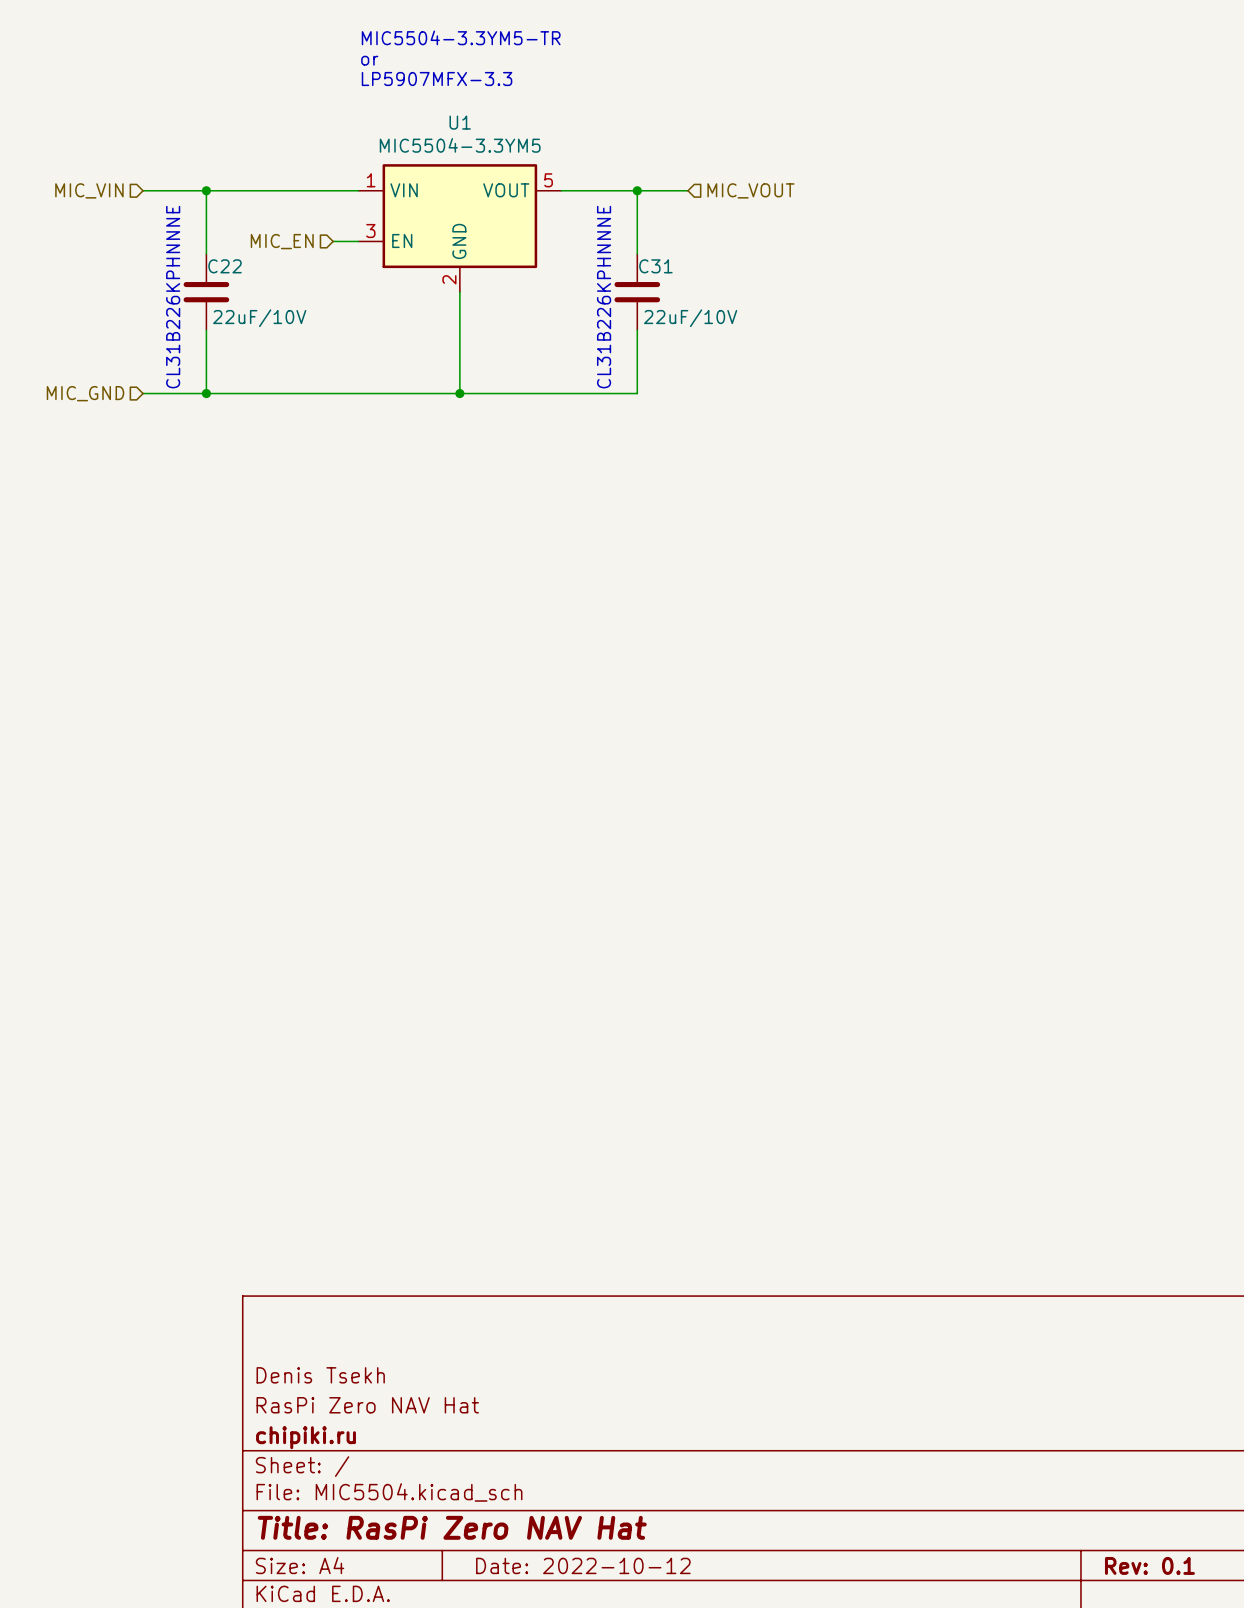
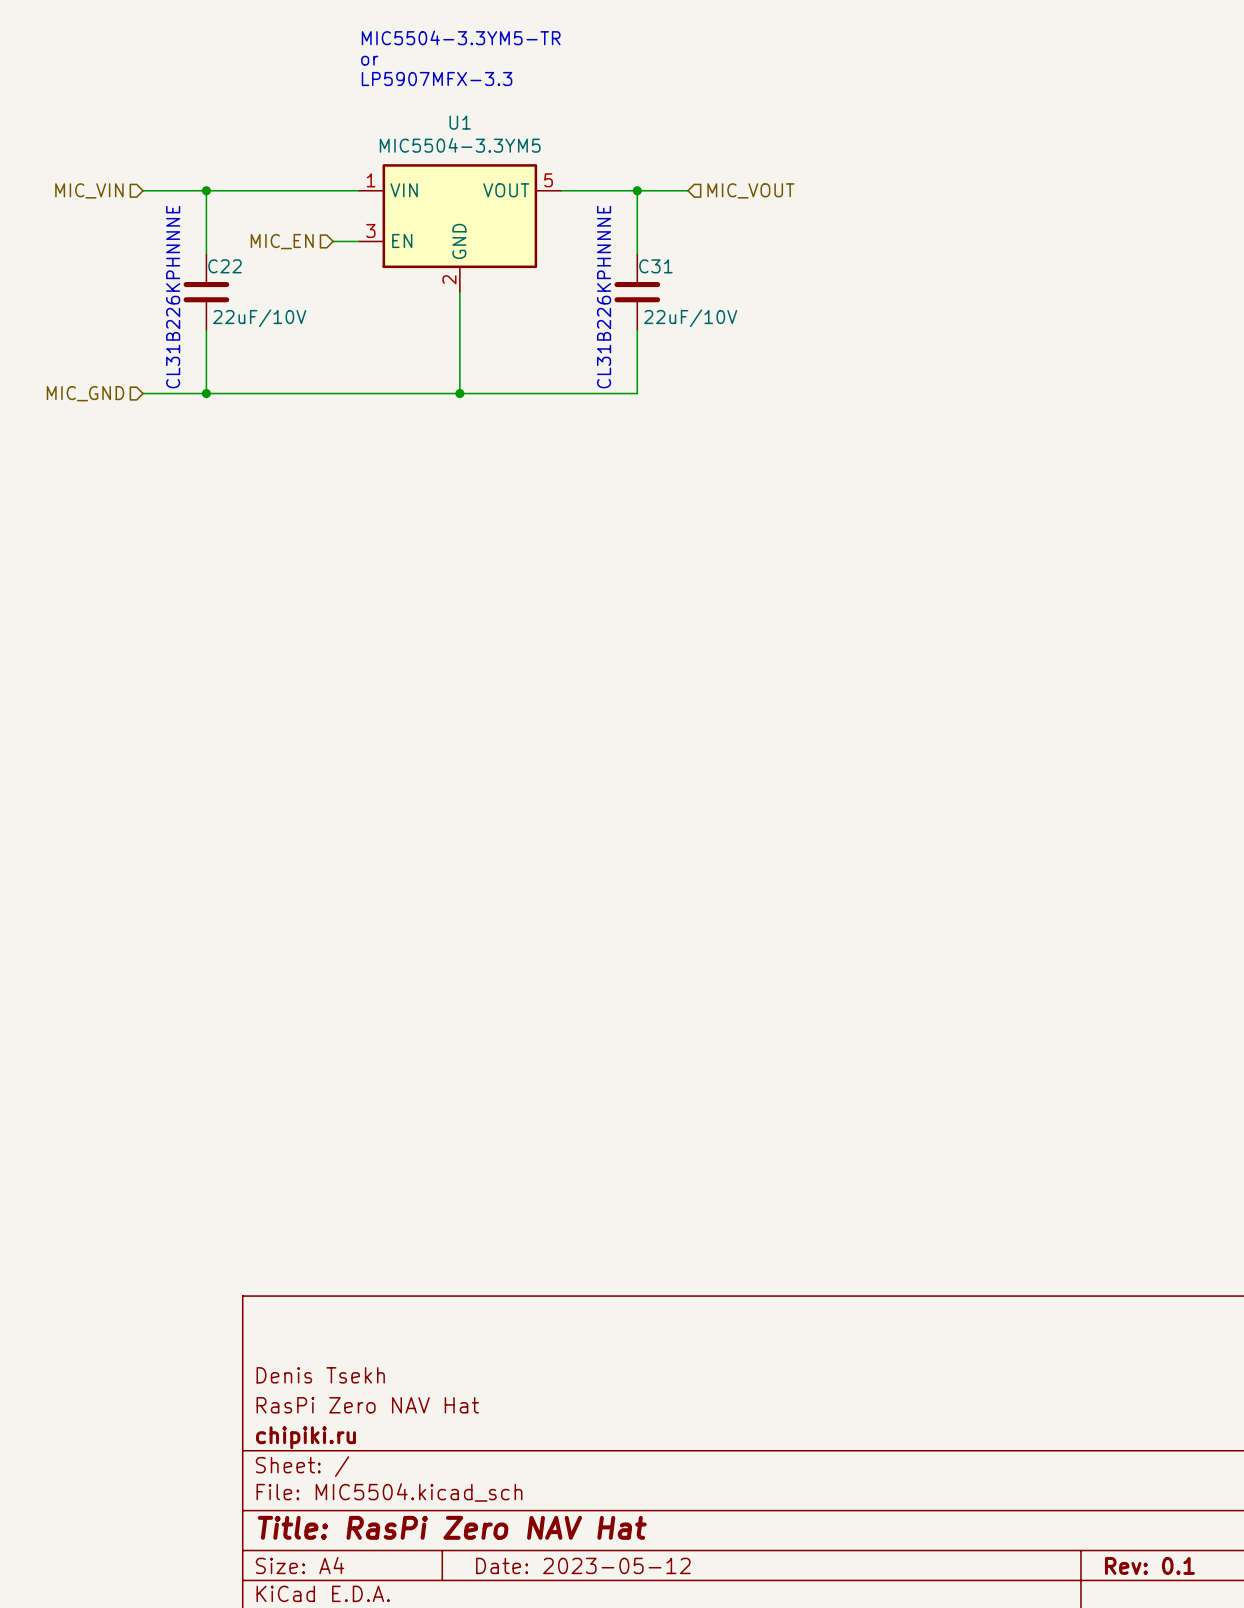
title block: Date: 2022-10-12 (583, 1565) -> Date: 2023-05-12 (583, 1565)

